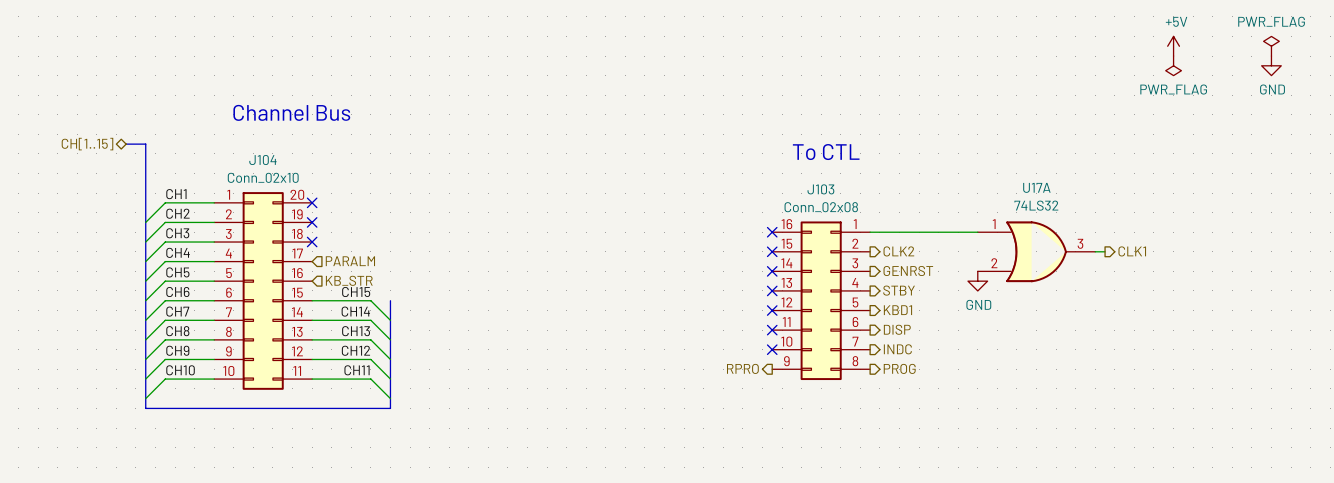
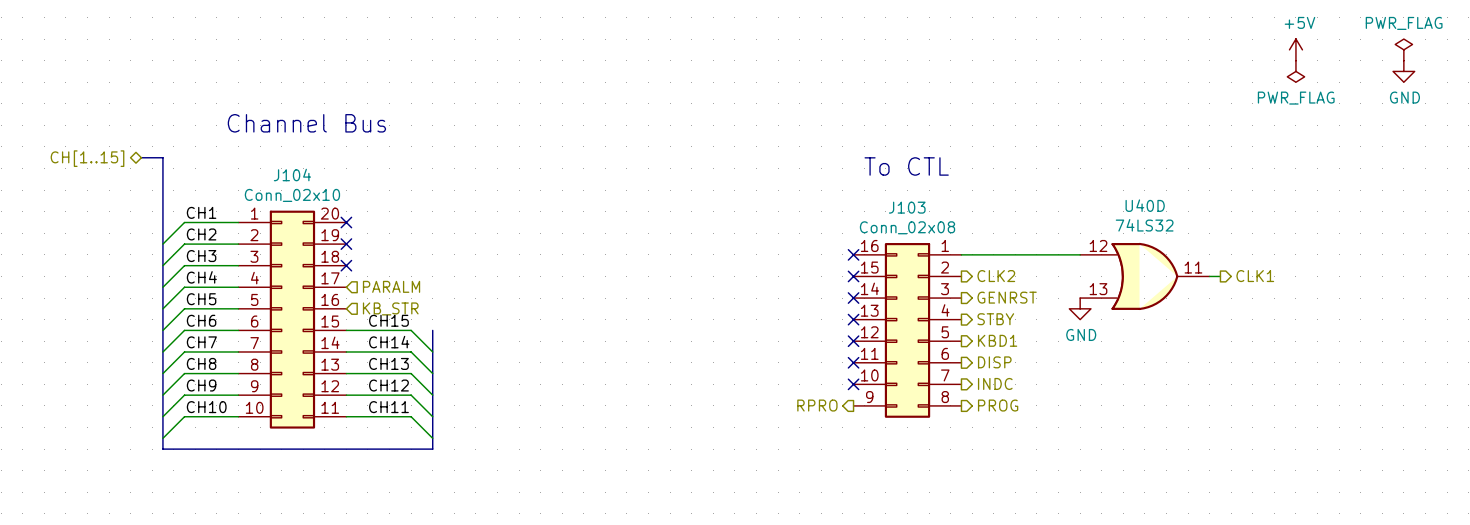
U17A name: U17A (1036, 187) -> U40D (1145, 205)
U17A pin number: 1 (994, 224) -> 12 (1098, 245)
U17A pin number: 3 (1080, 243) -> 11 (1193, 267)
U17A pin number: 2 (994, 263) -> 13 (1098, 289)

